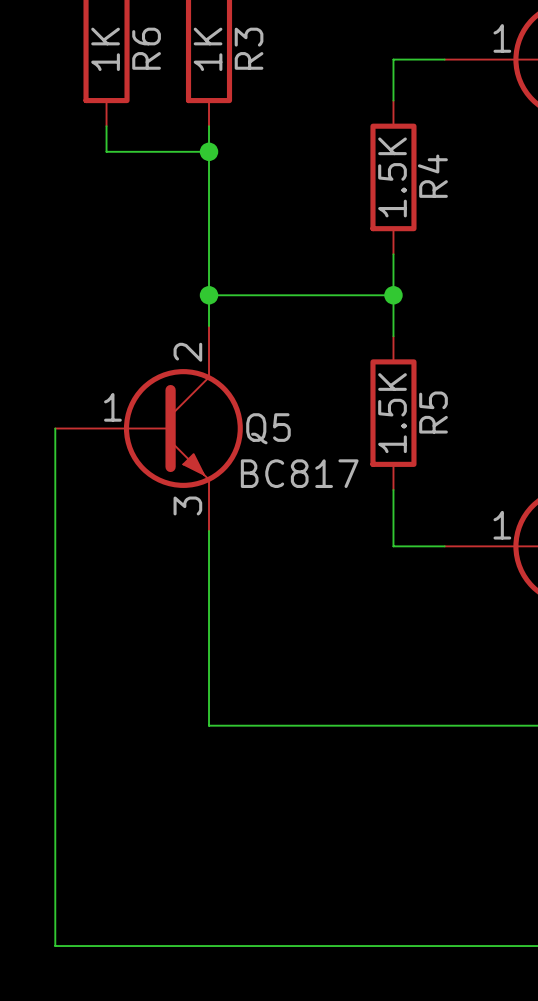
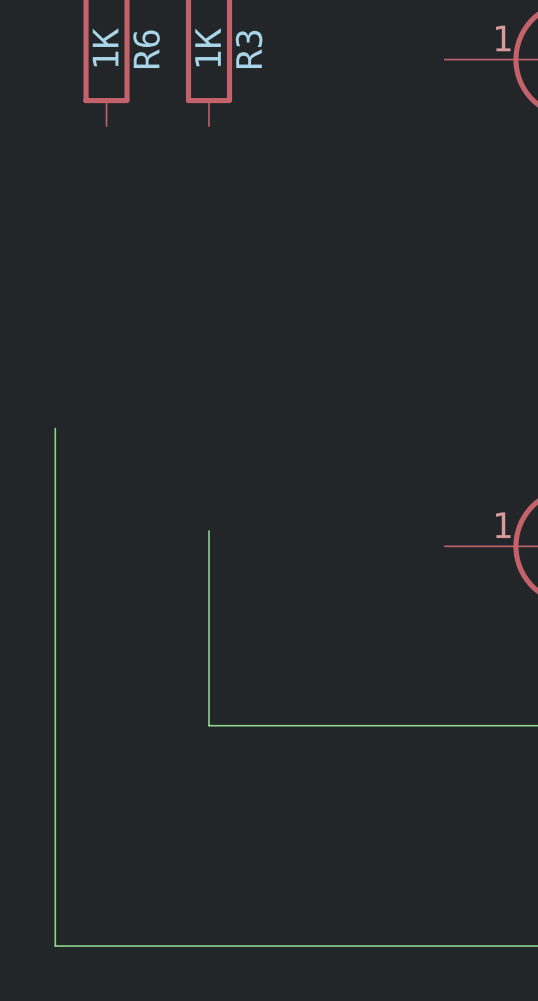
wire: (444, 59) (393, 59) (393, 100) -> none
wire: (106, 126) (106, 151) (209, 151) -> none
wire: (209, 126) (209, 326) -> none
junction: (209, 151) -> none
R4: 1.5K (393, 177) -> none
wire: (393, 254) (393, 336) -> none
wire: (209, 295) (393, 295) -> none
junction: (209, 295) -> none
junction: (393, 295) -> none
R5: 1.5K (393, 413) -> none
Q5: BC817 (149, 428) -> none
wire: (393, 489) (393, 546) (444, 546) -> none

